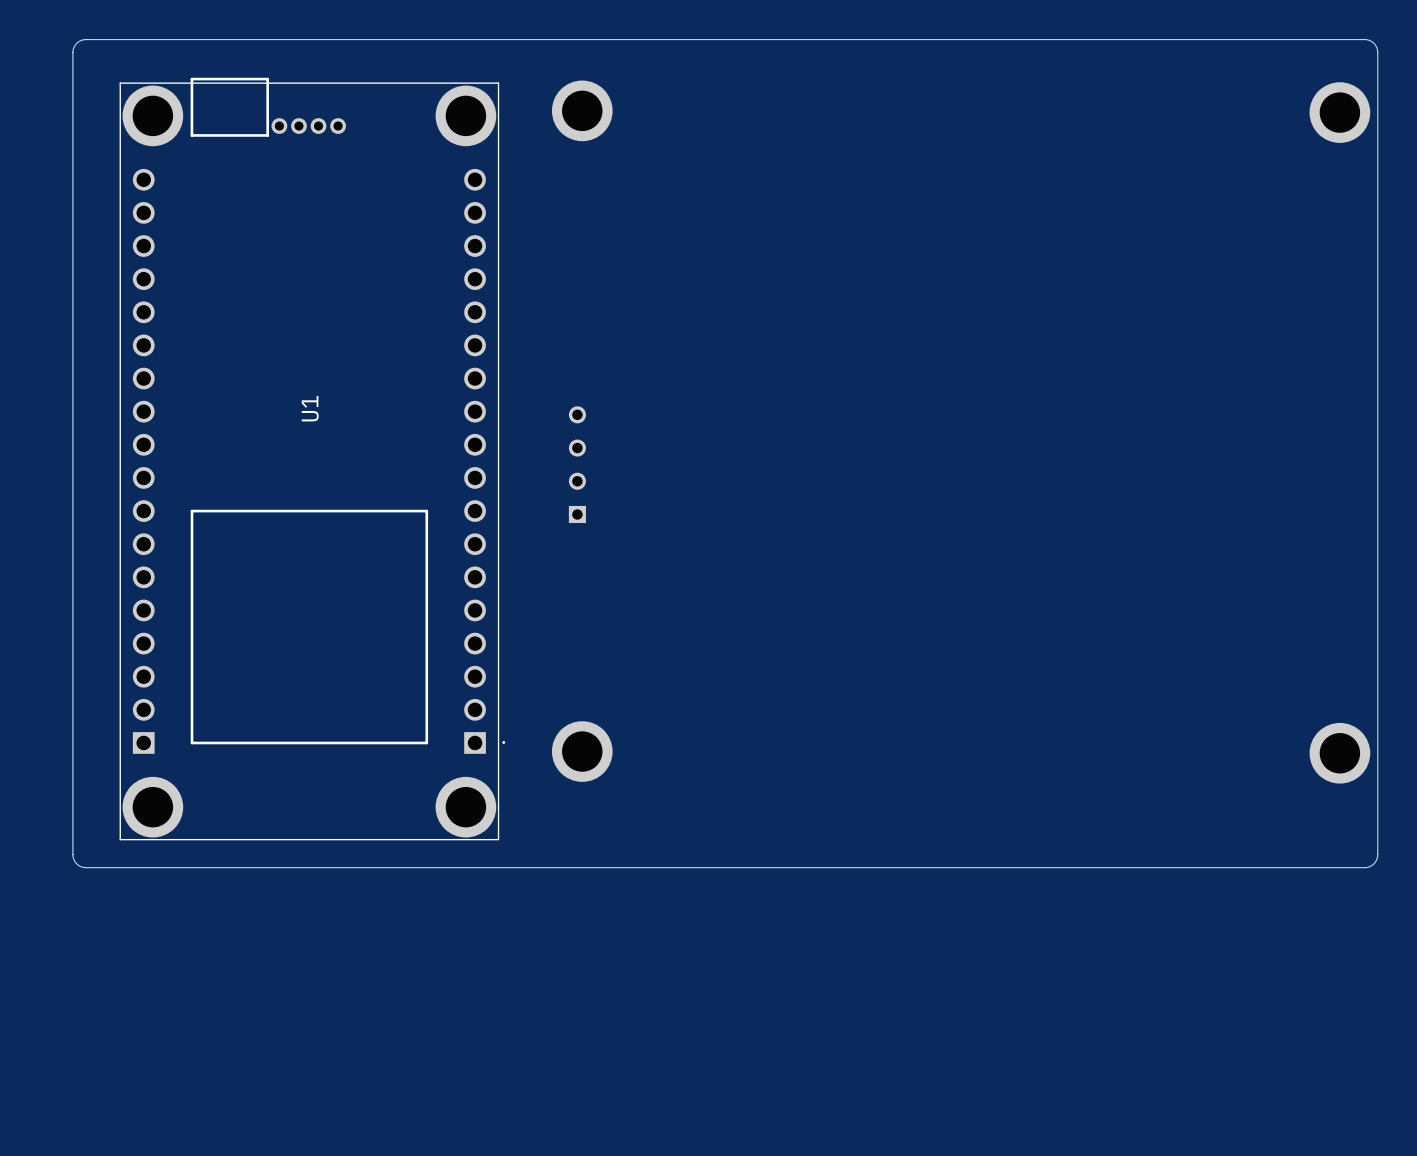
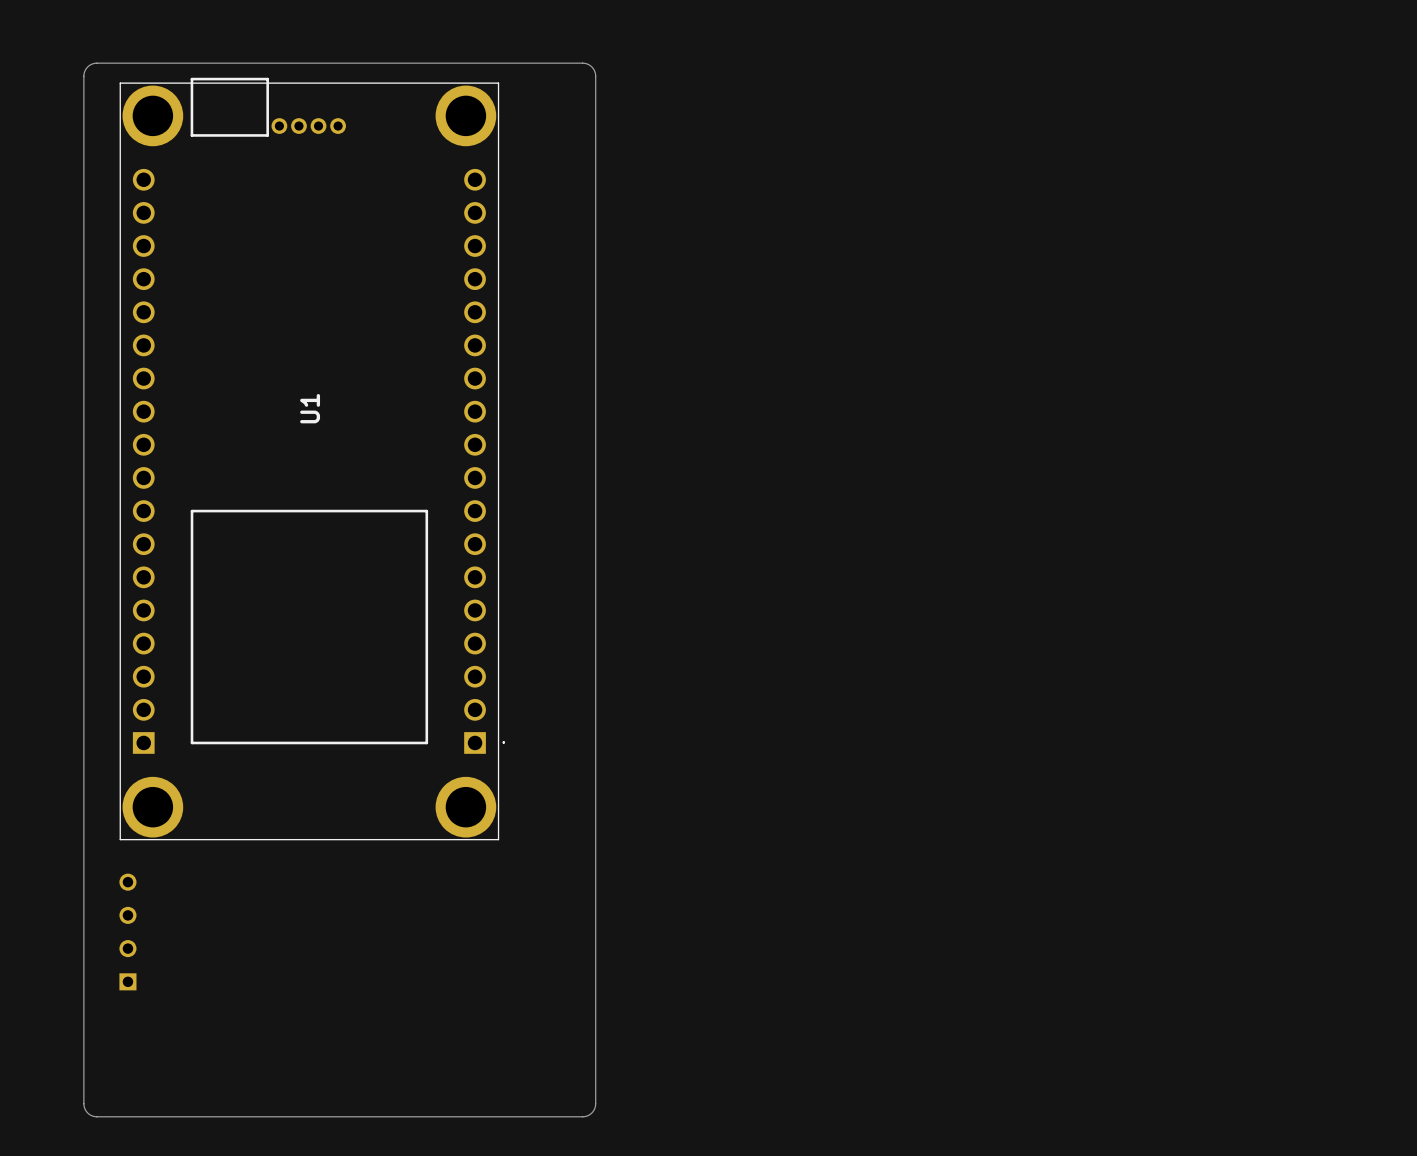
board edge: (85, 39) (1364, 39) (1371, 41) (1376, 46) (1377, 52) (1377, 854) (1375, 861) (1370, 866) (1364, 867) (85, 867) (79, 865) (74, 860) (72, 854) (72, 52) (76, 43) (85, 39) -> none
board edge: none -> (96, 63) (582, 63) (589, 65) (594, 70) (595, 1103) (593, 1110) (588, 1115) (96, 1116) (89, 1114) (85, 1109) (83, 76) (87, 66) (96, 63)
part: (582, 110) -> none
part: (1339, 112) -> none
part: (577, 464) -> none
part: (582, 751) -> none
part: (1339, 753) -> none
part: none -> (127, 931)

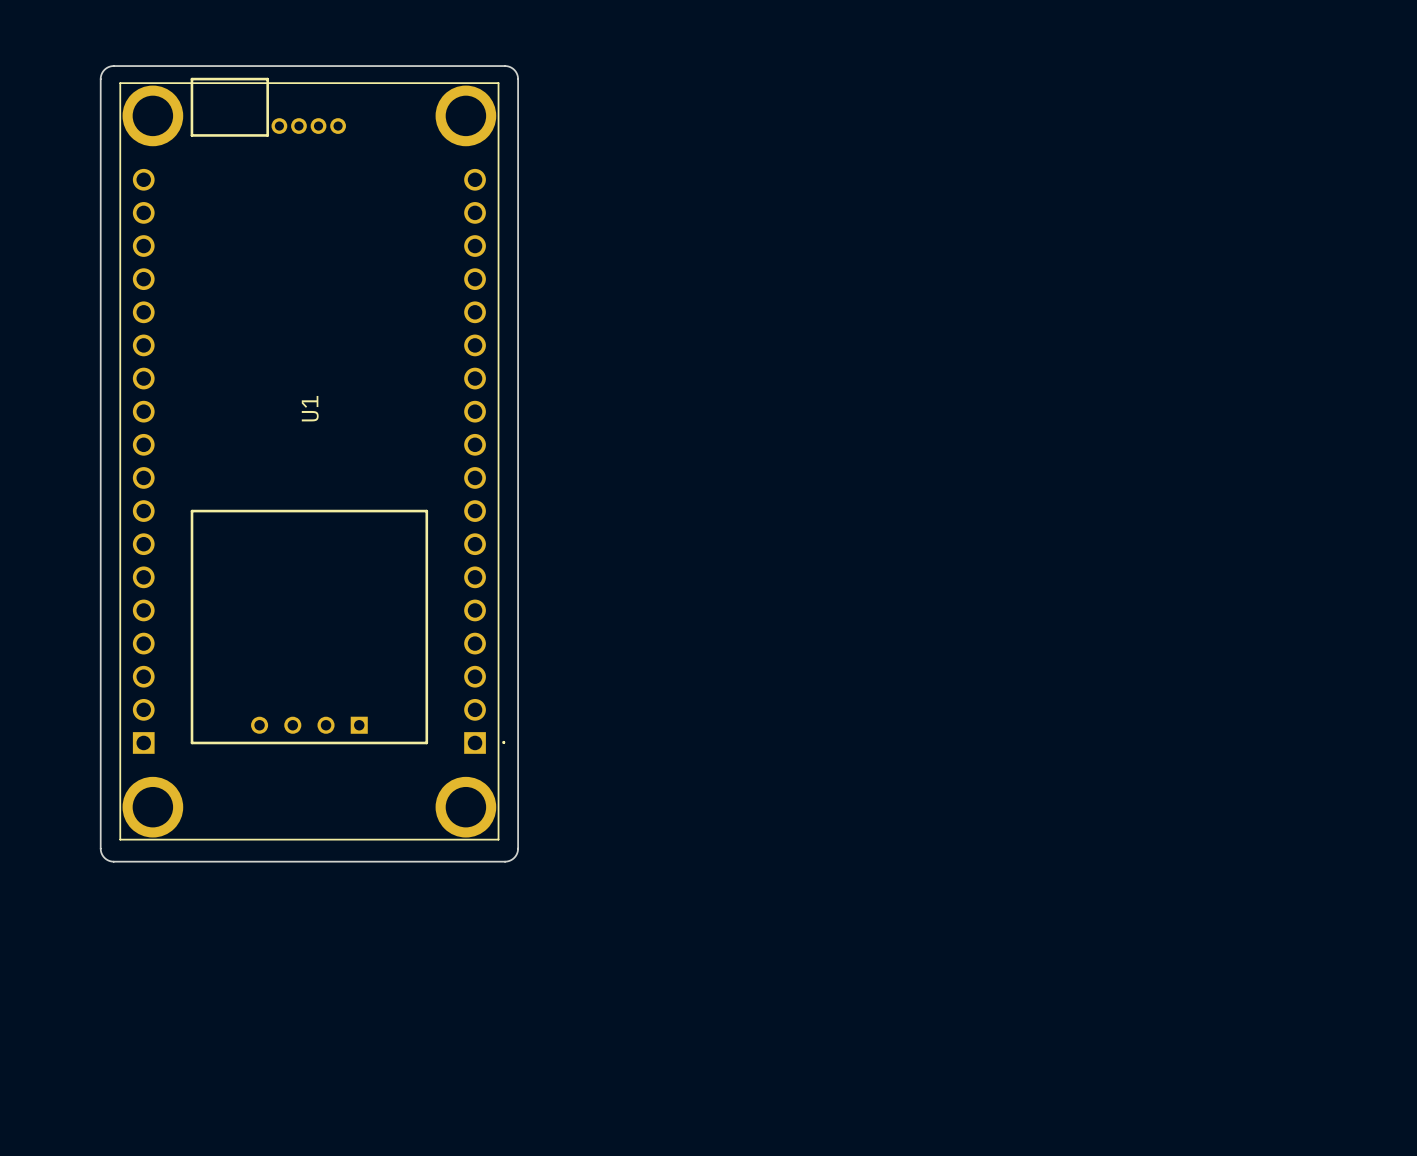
board edge: (96, 63) (582, 63) (589, 65) (594, 70) (595, 1103) (593, 1110) (588, 1115) (96, 1116) (89, 1114) (85, 1109) (83, 76) (87, 66) (96, 63) -> (113, 66) (104, 69) (100, 79) (101, 854) (106, 859) (113, 861) (510, 860) (516, 855) (518, 848) (516, 73) (511, 68) (505, 66) (113, 66)
part rotation: 0° (127, 931) -> 90° counterclockwise (309, 725)
part position: (127, 931) -> (309, 725)

